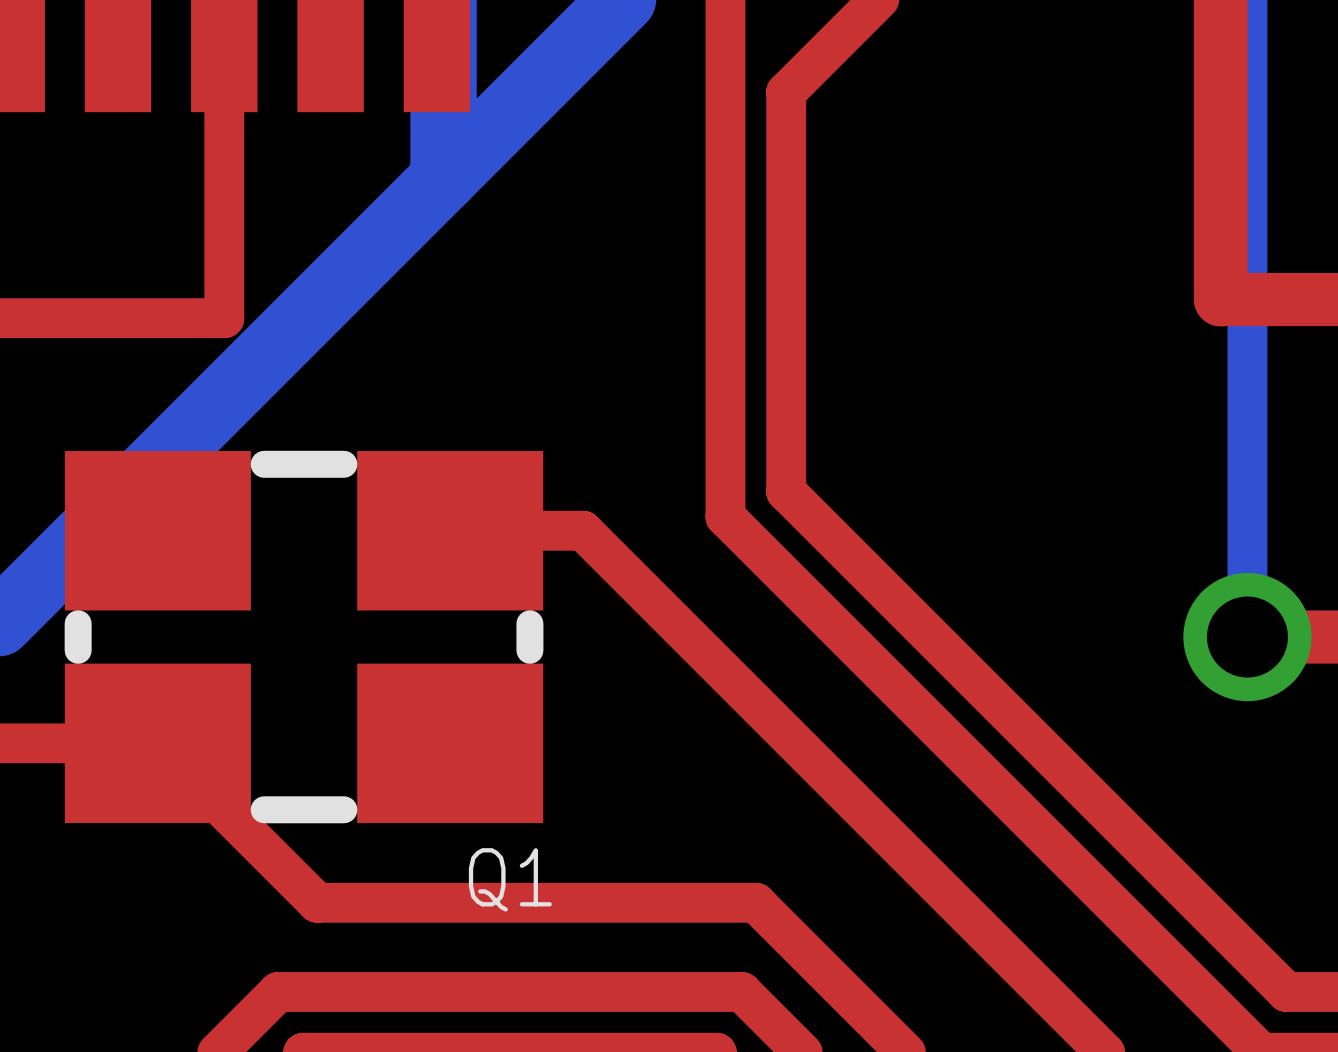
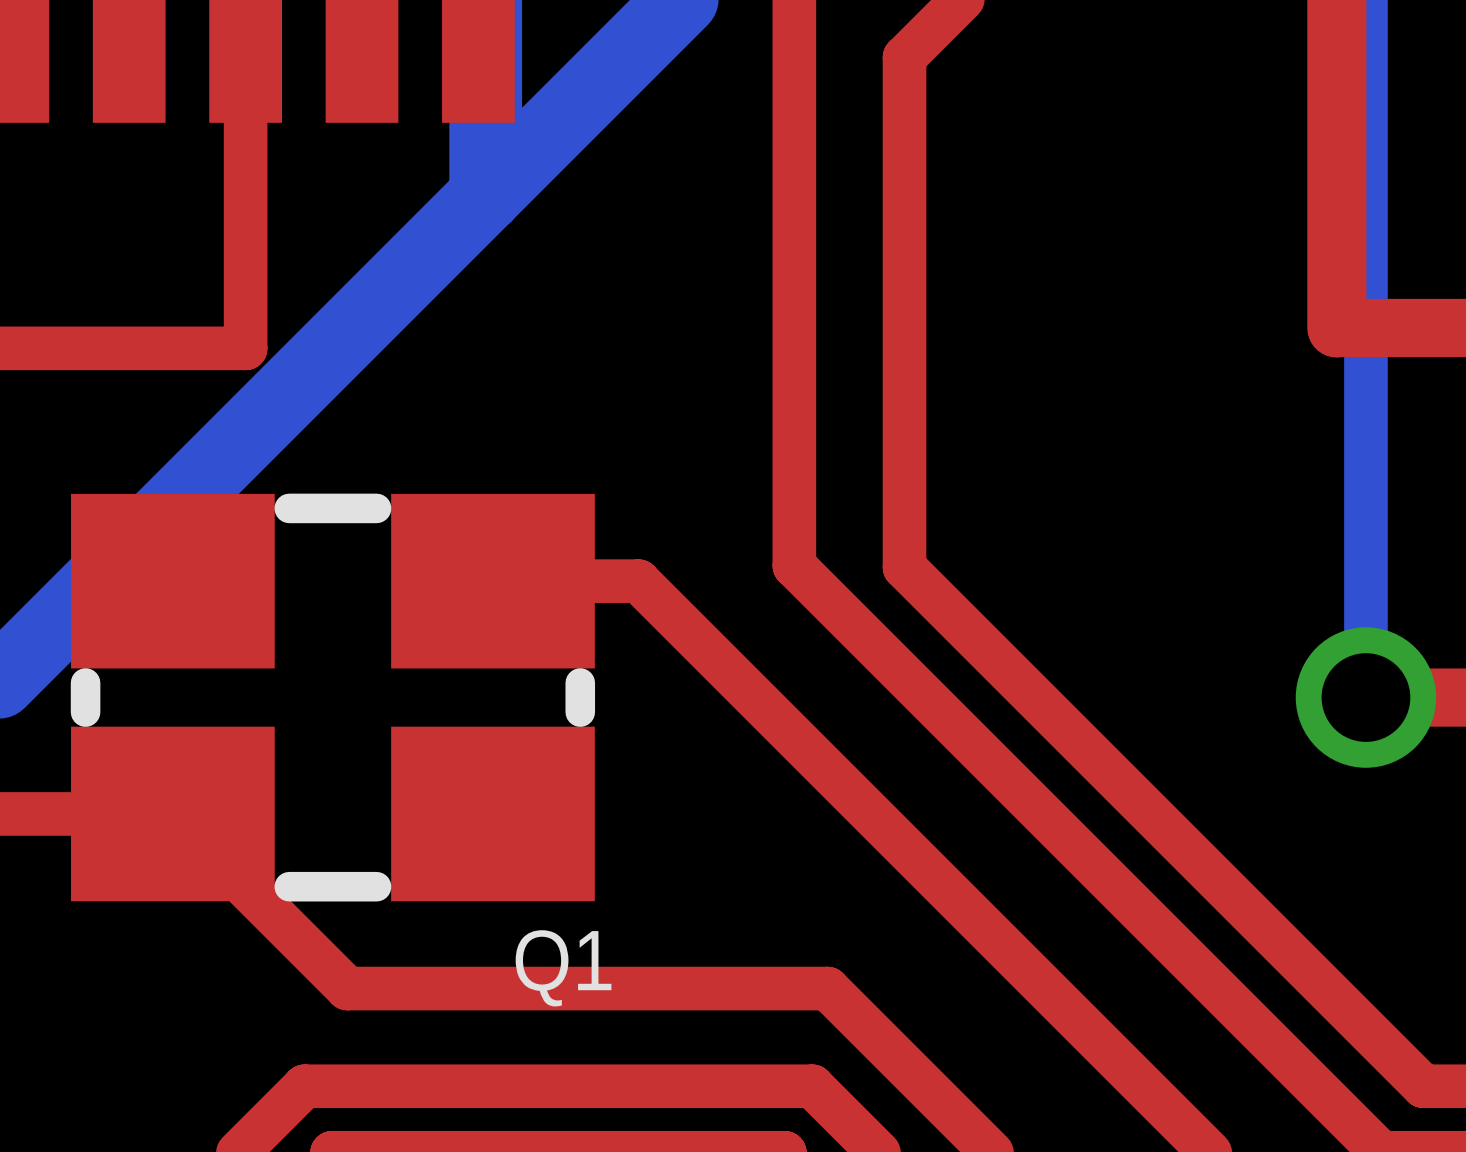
top track: (826, 52) (786, 92) (786, 491) (1286, 992) (1299, 992) -> (904, 57) (904, 567) (1423, 1086)

